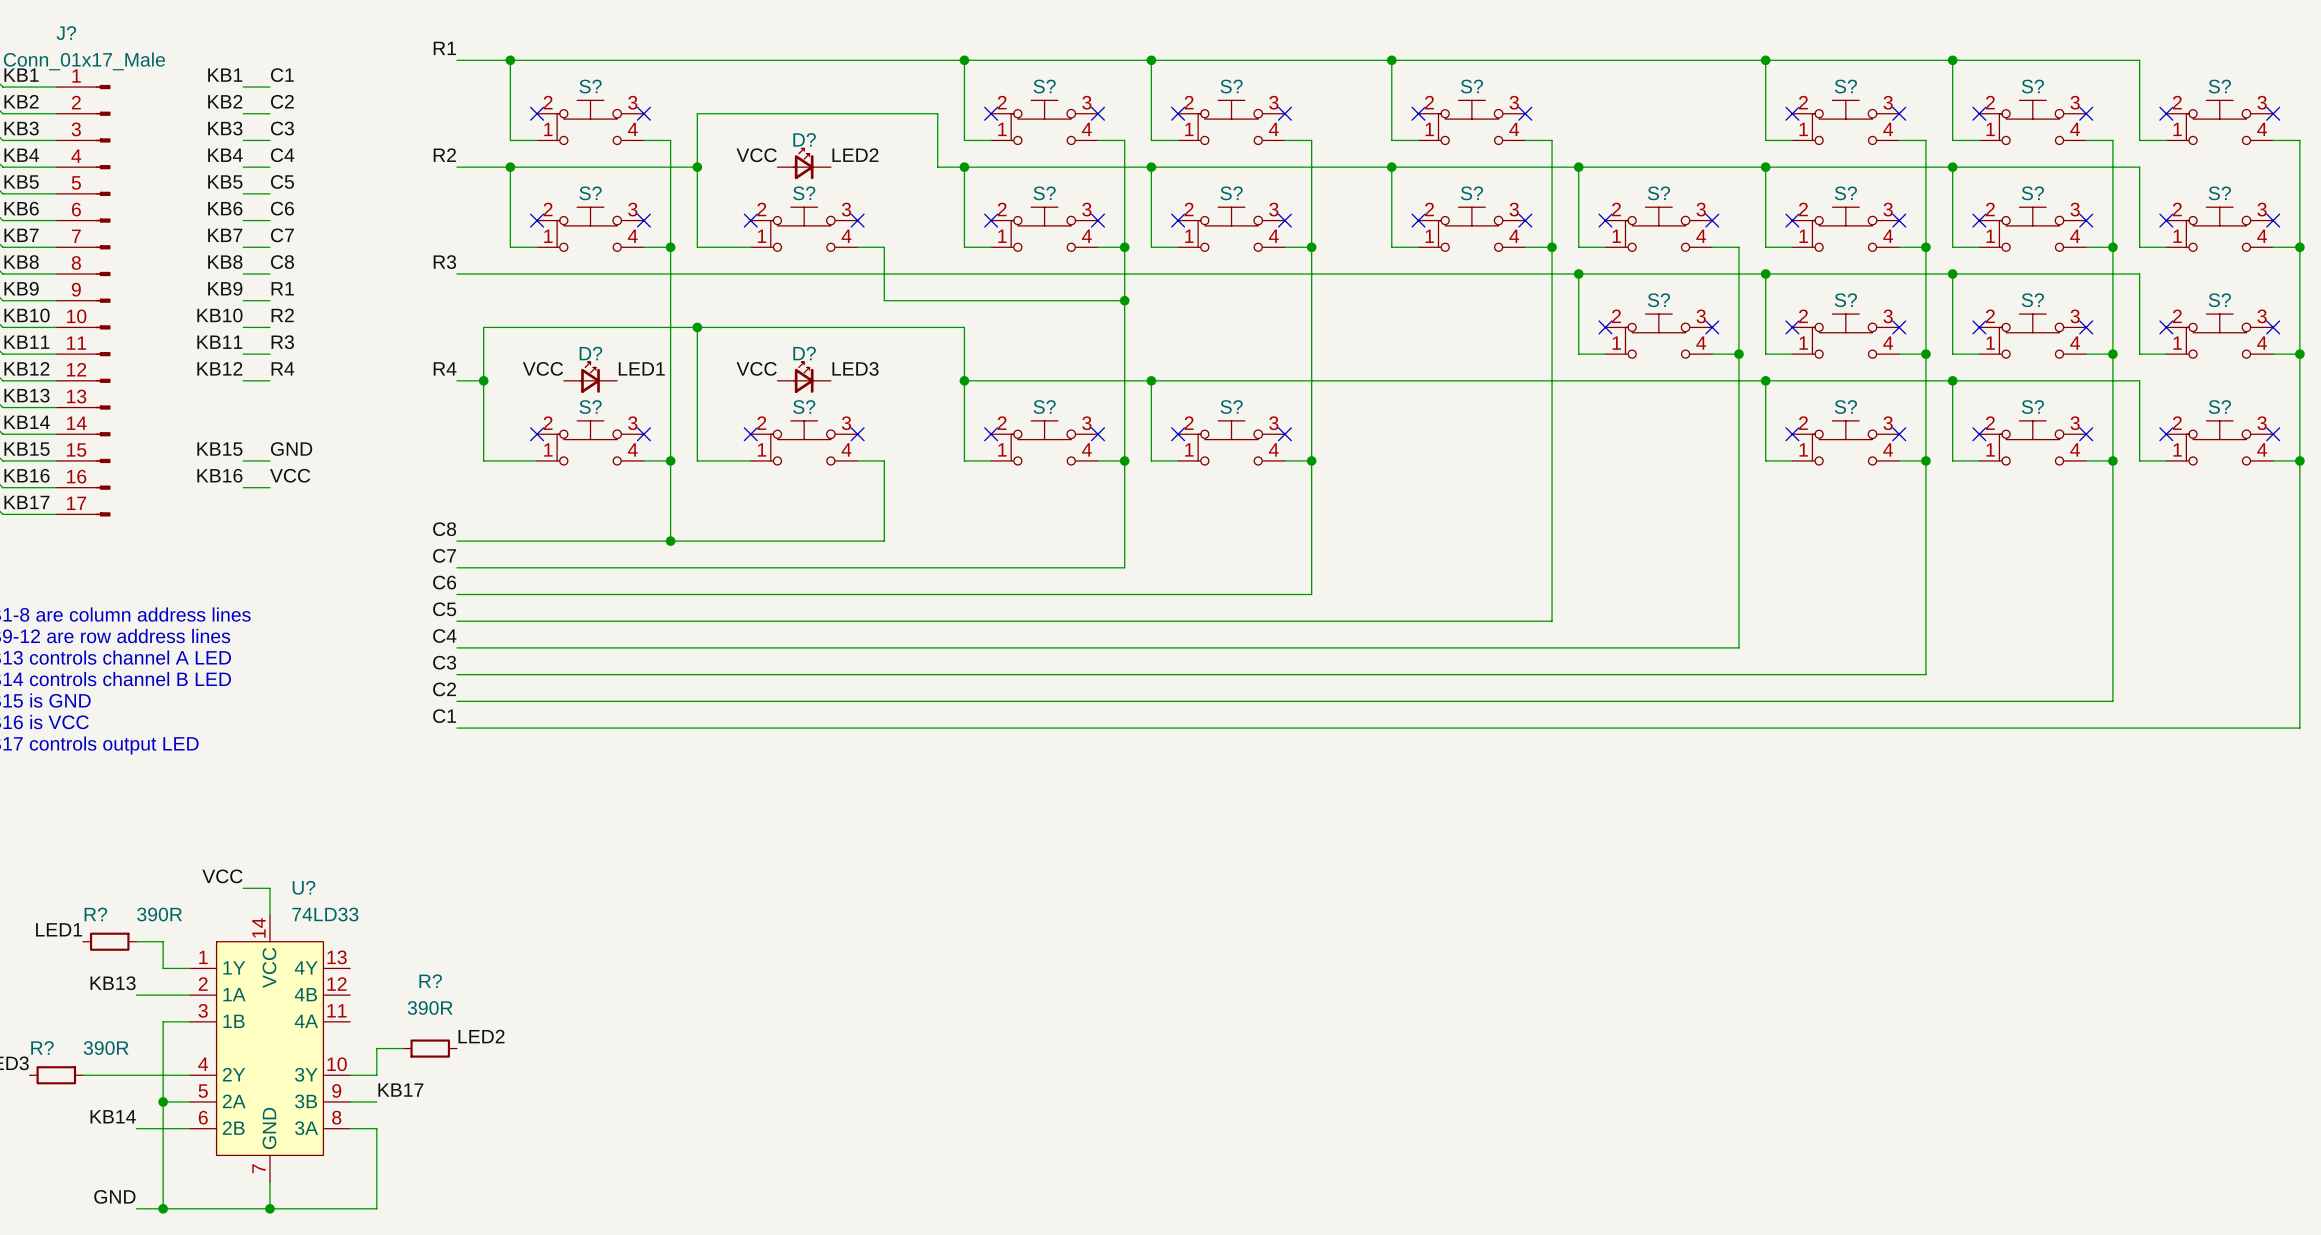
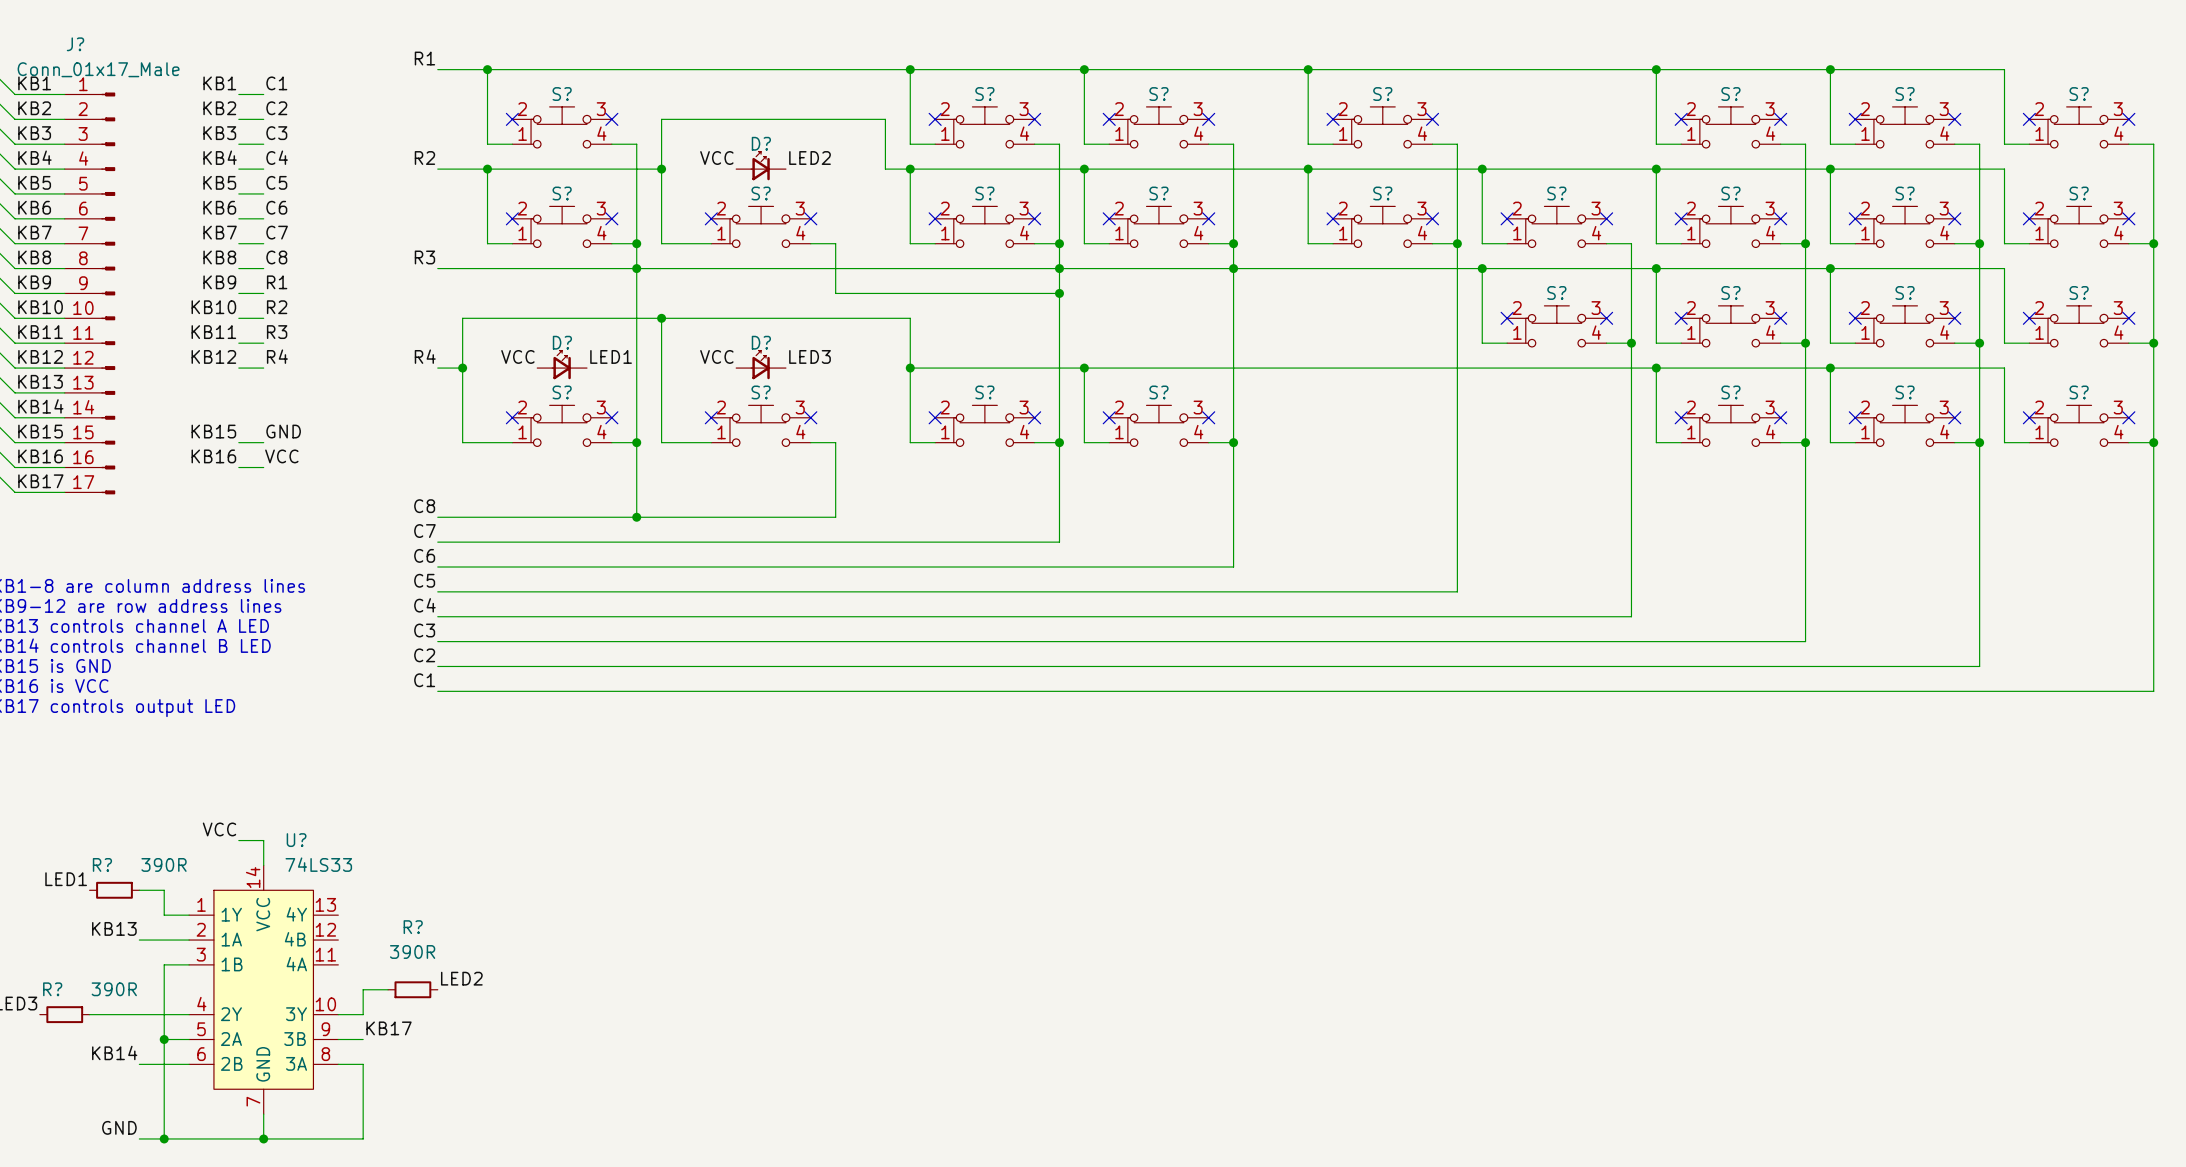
junction: none -> (636, 268)
junction: none -> (1059, 268)
junction: none -> (1233, 268)
U? value: 74LD33 (325, 914) -> 74LS33 (318, 864)

